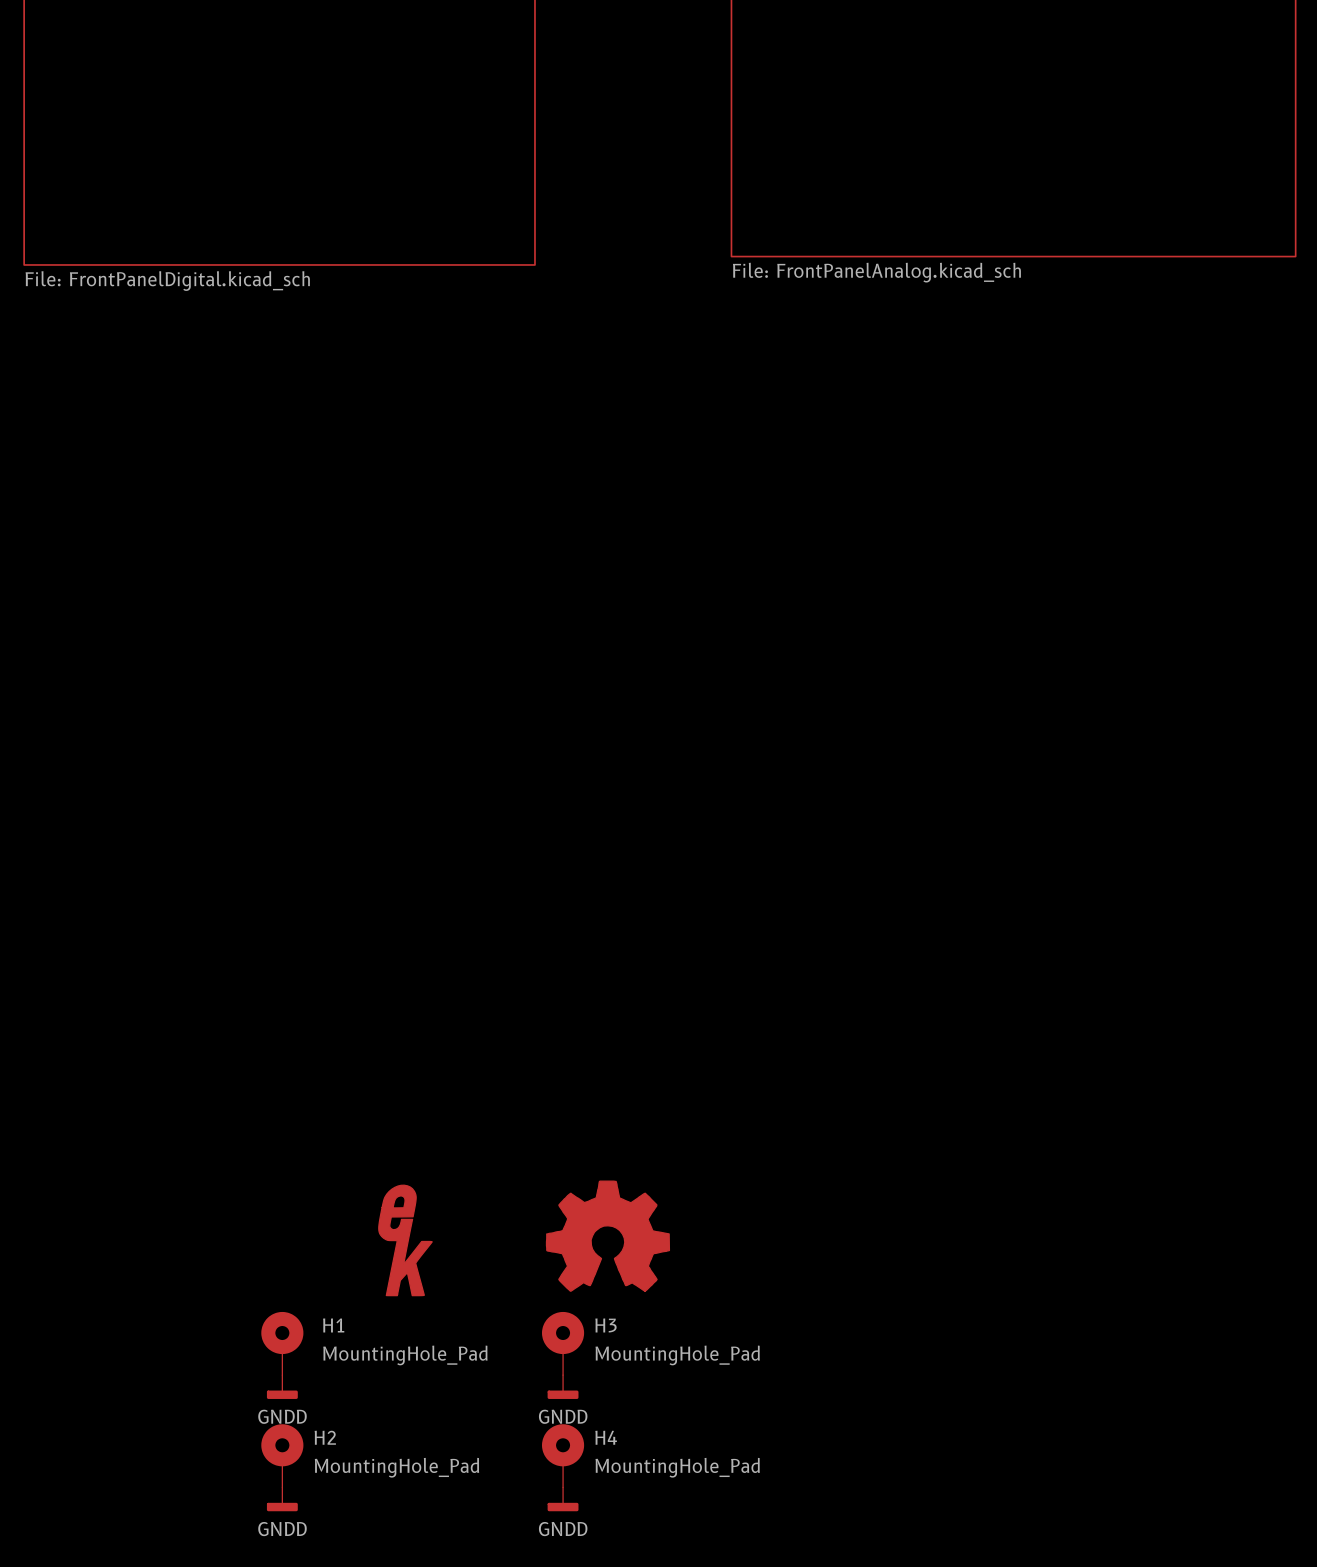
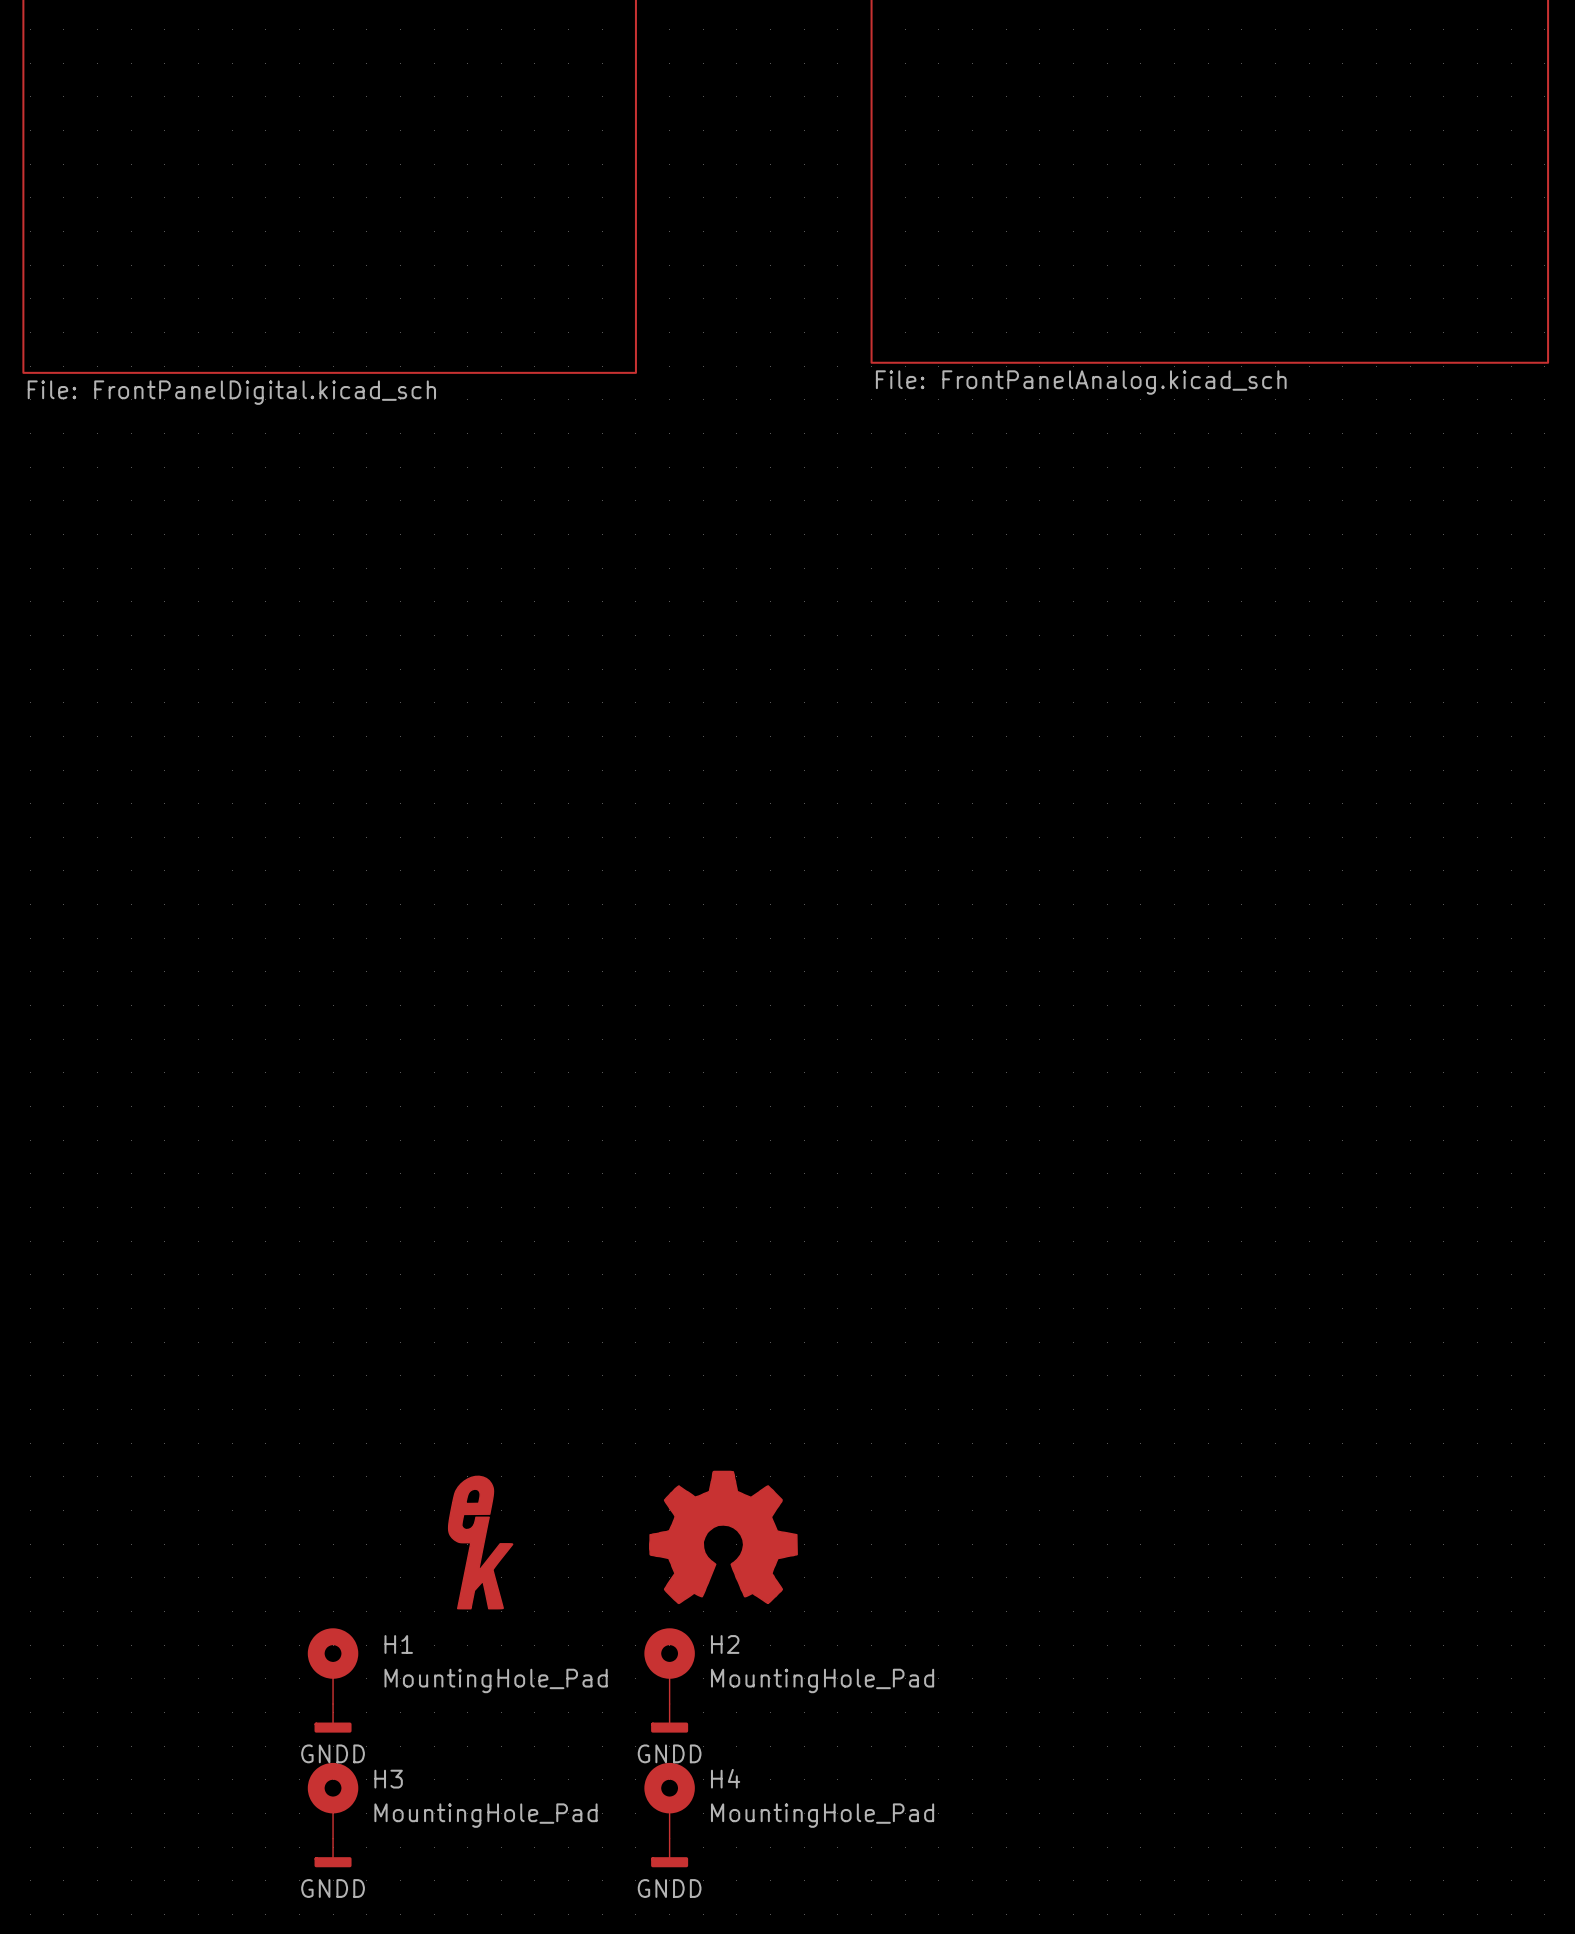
H3 name: H3 (605, 1325) -> H2 (725, 1644)
H2 name: H2 (325, 1437) -> H3 (388, 1779)

